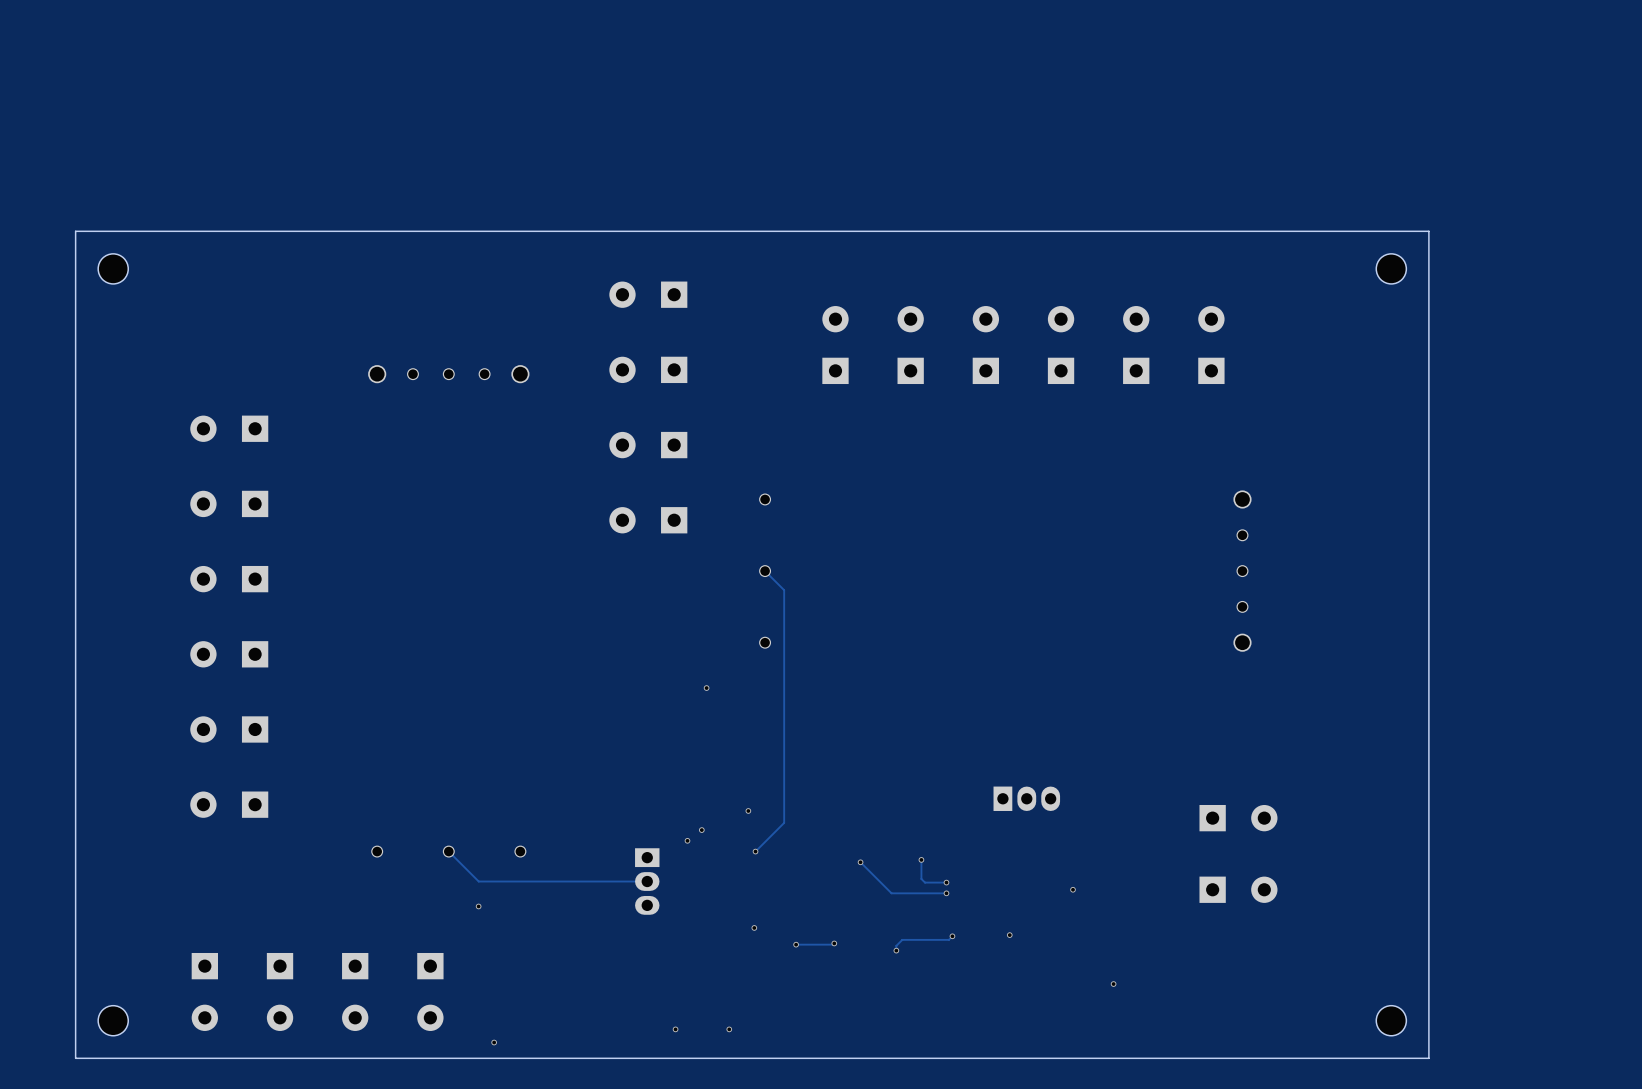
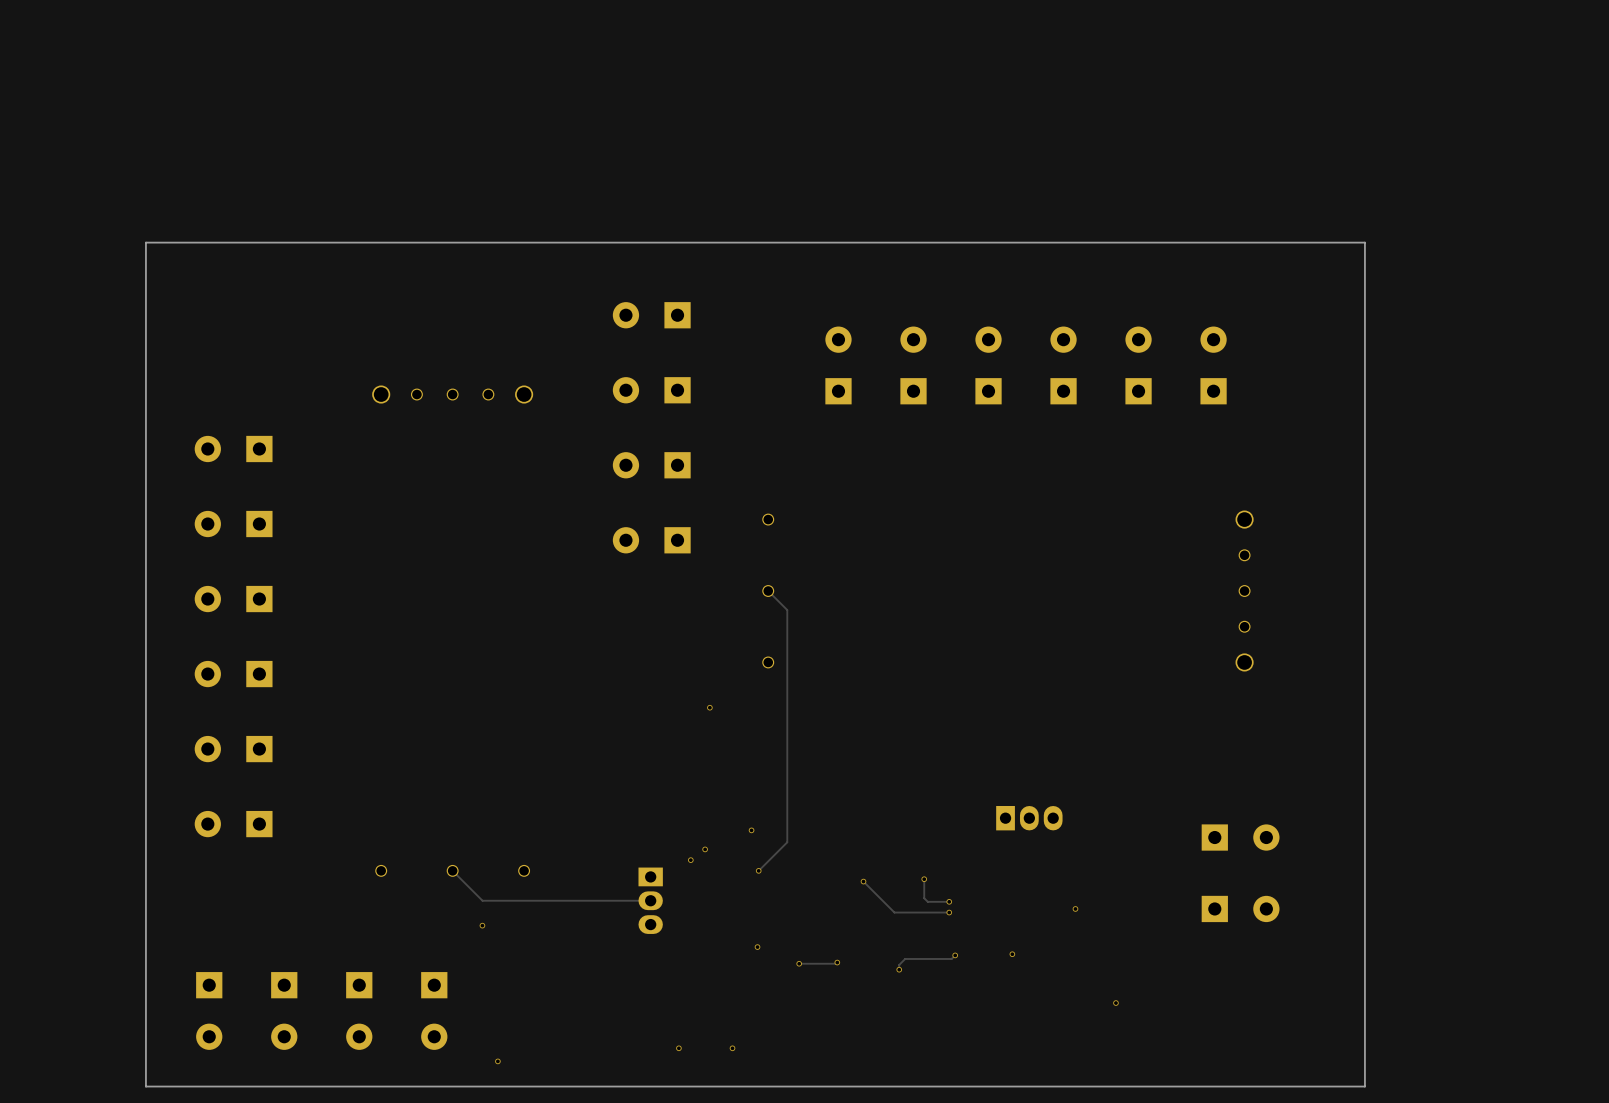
board edge: (1428, 231) (1428, 1058) (75, 1058) (75, 231) (1428, 231) -> (1364, 242) (1364, 1086) (145, 1086) (145, 242) (1364, 242)
part: (113, 268) -> none
part: (1391, 268) -> none
part: (113, 1020) -> none
part: (1391, 1020) -> none

